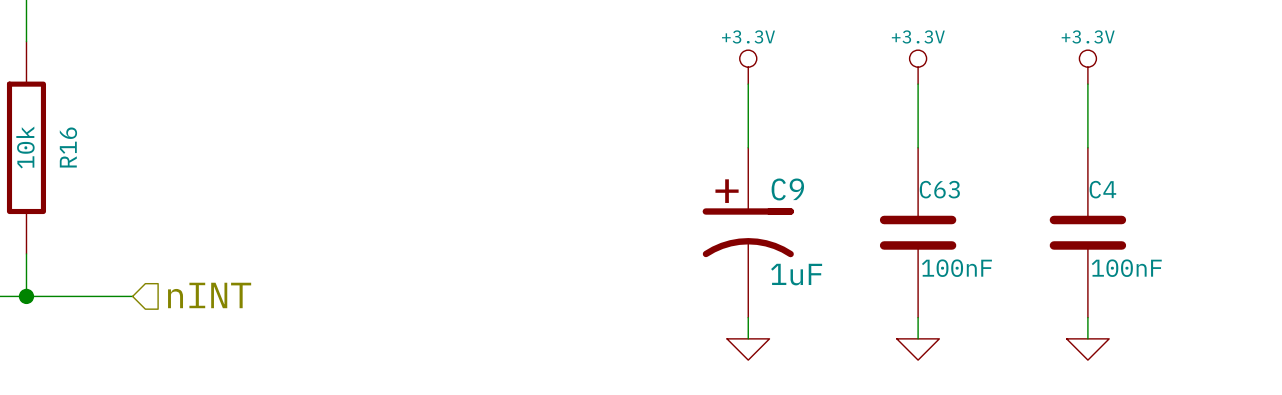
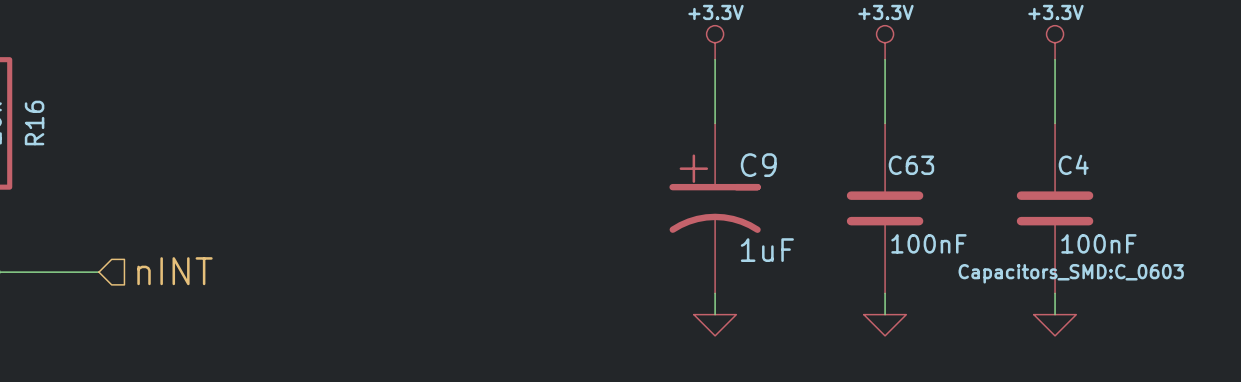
C4 text: none -> Capacitors_SMD:C_0603 (1071, 273)

